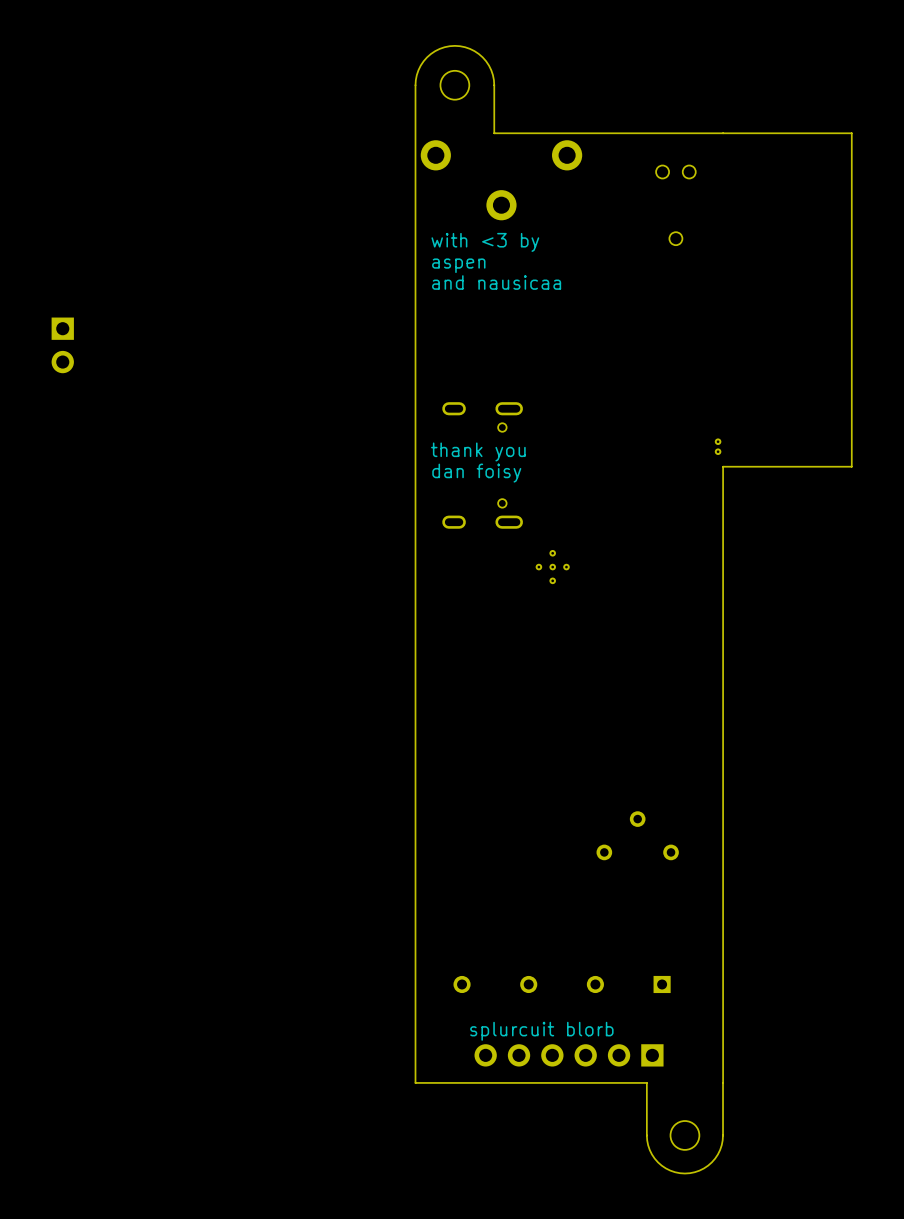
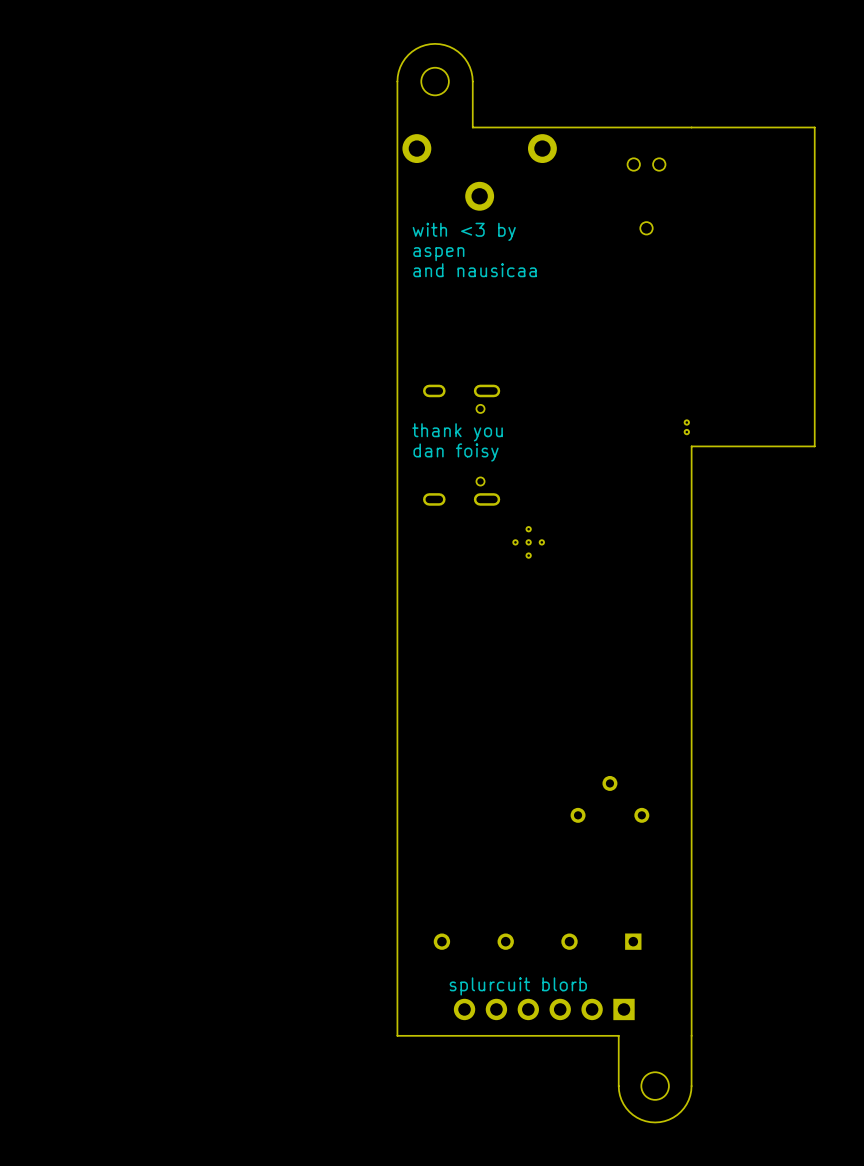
part: (62, 345) -> none

